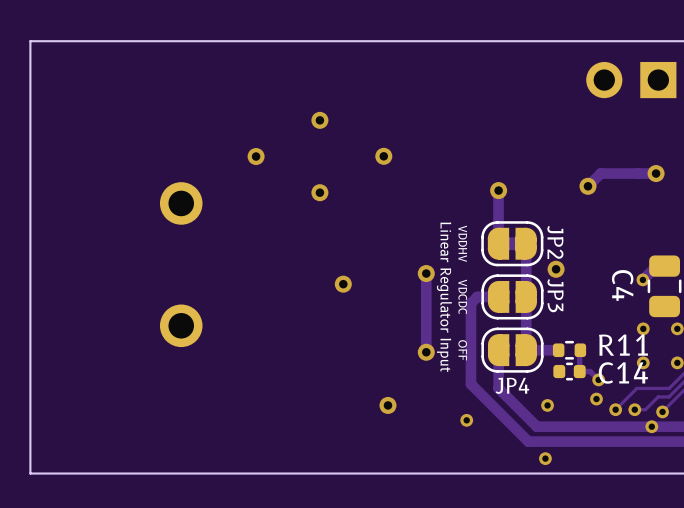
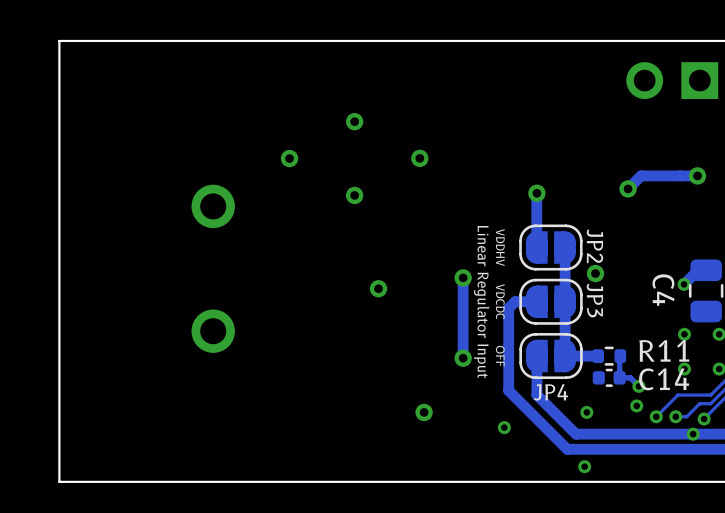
JP2 footprint: [481, 221, 544, 267] -> [519, 224, 583, 271]

